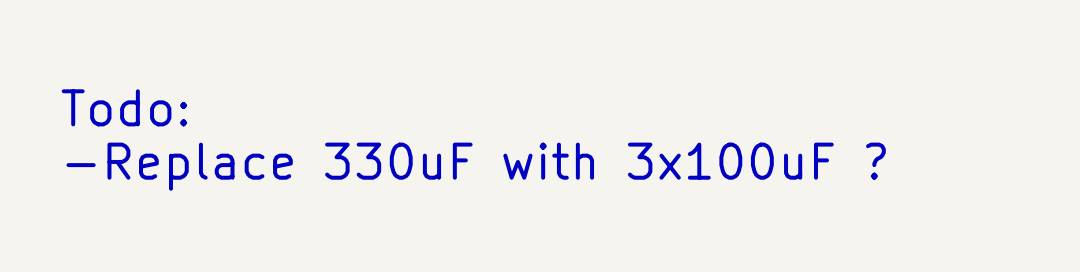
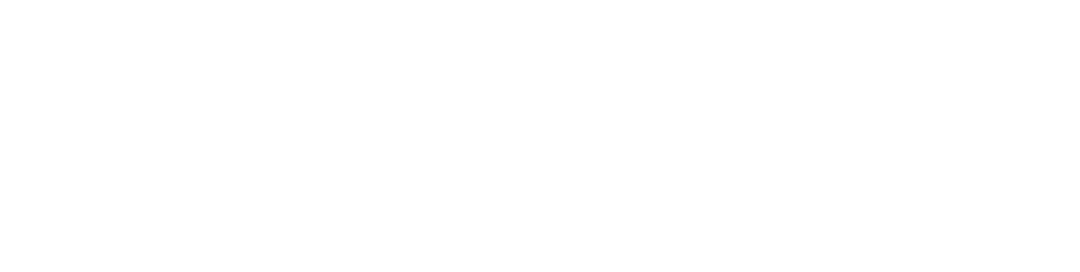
text: Todo: (124, 107) -> none
text: -Replace 330uF with 3x100uF ? (476, 166) -> none

